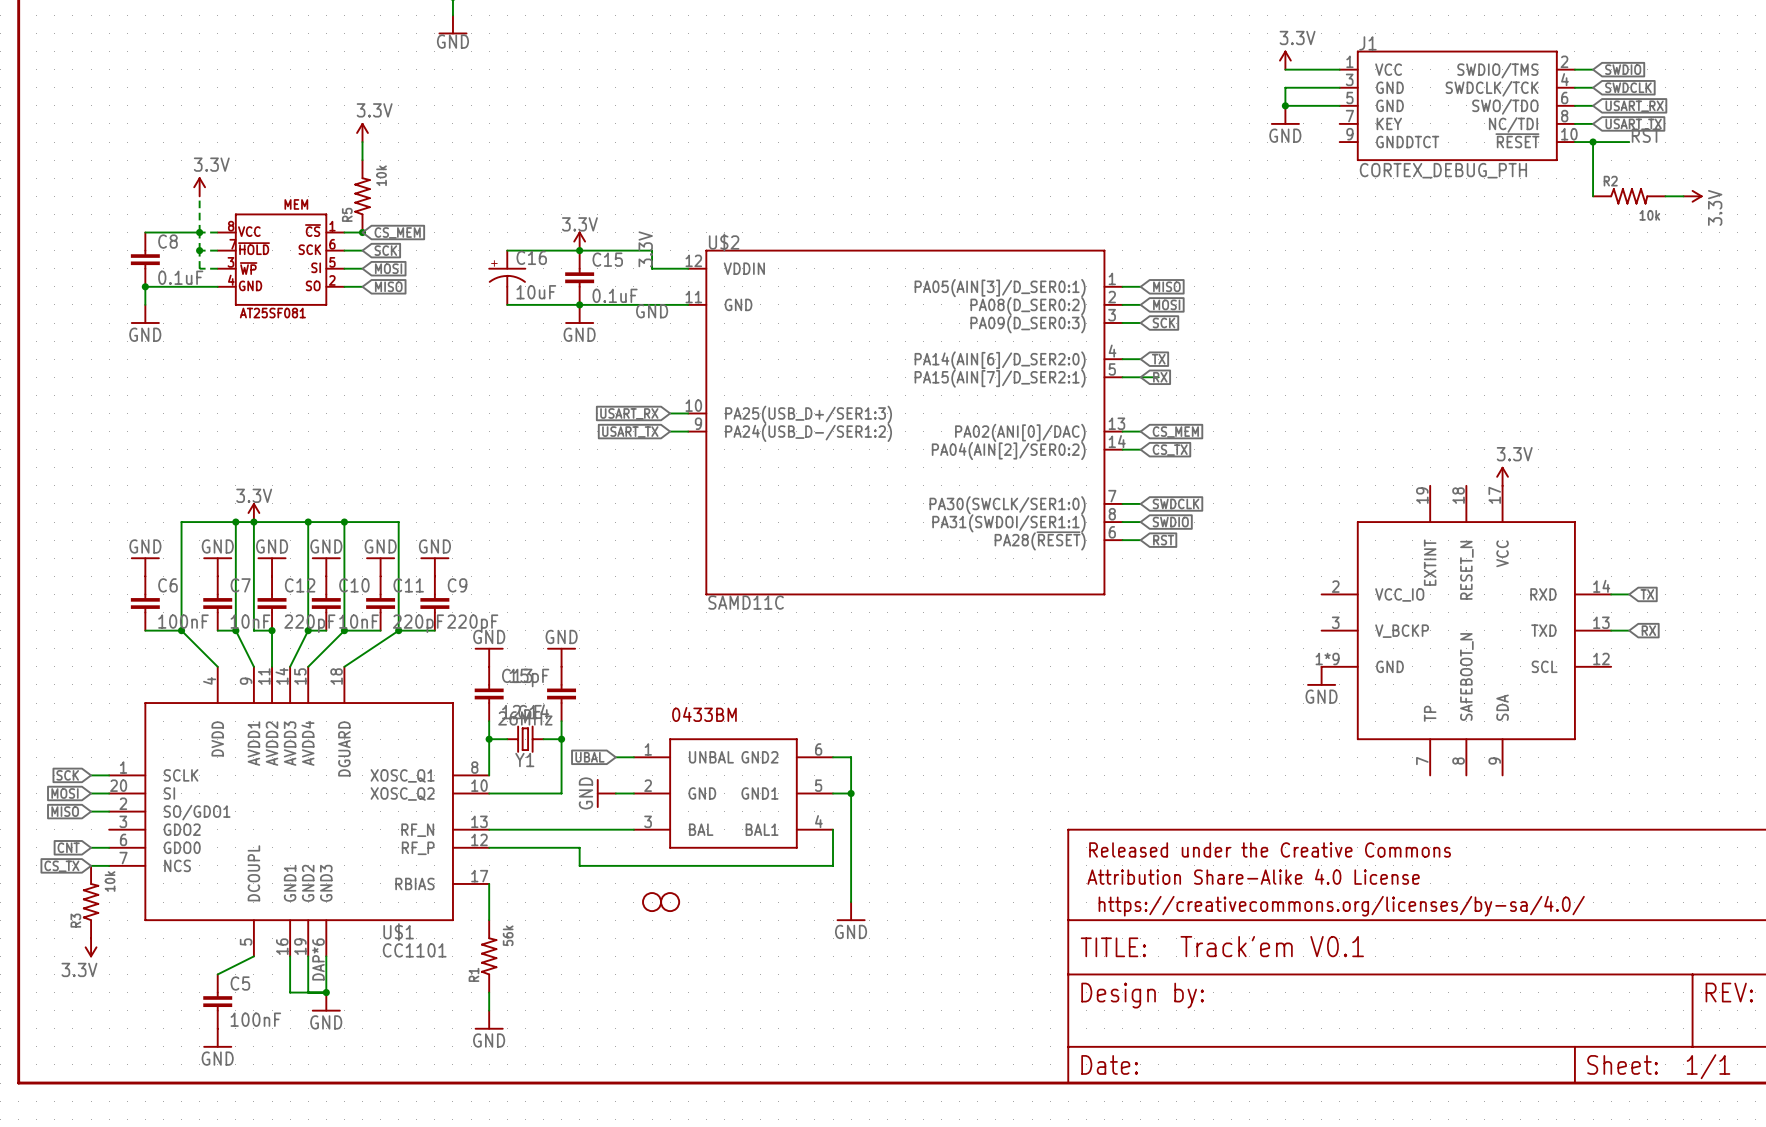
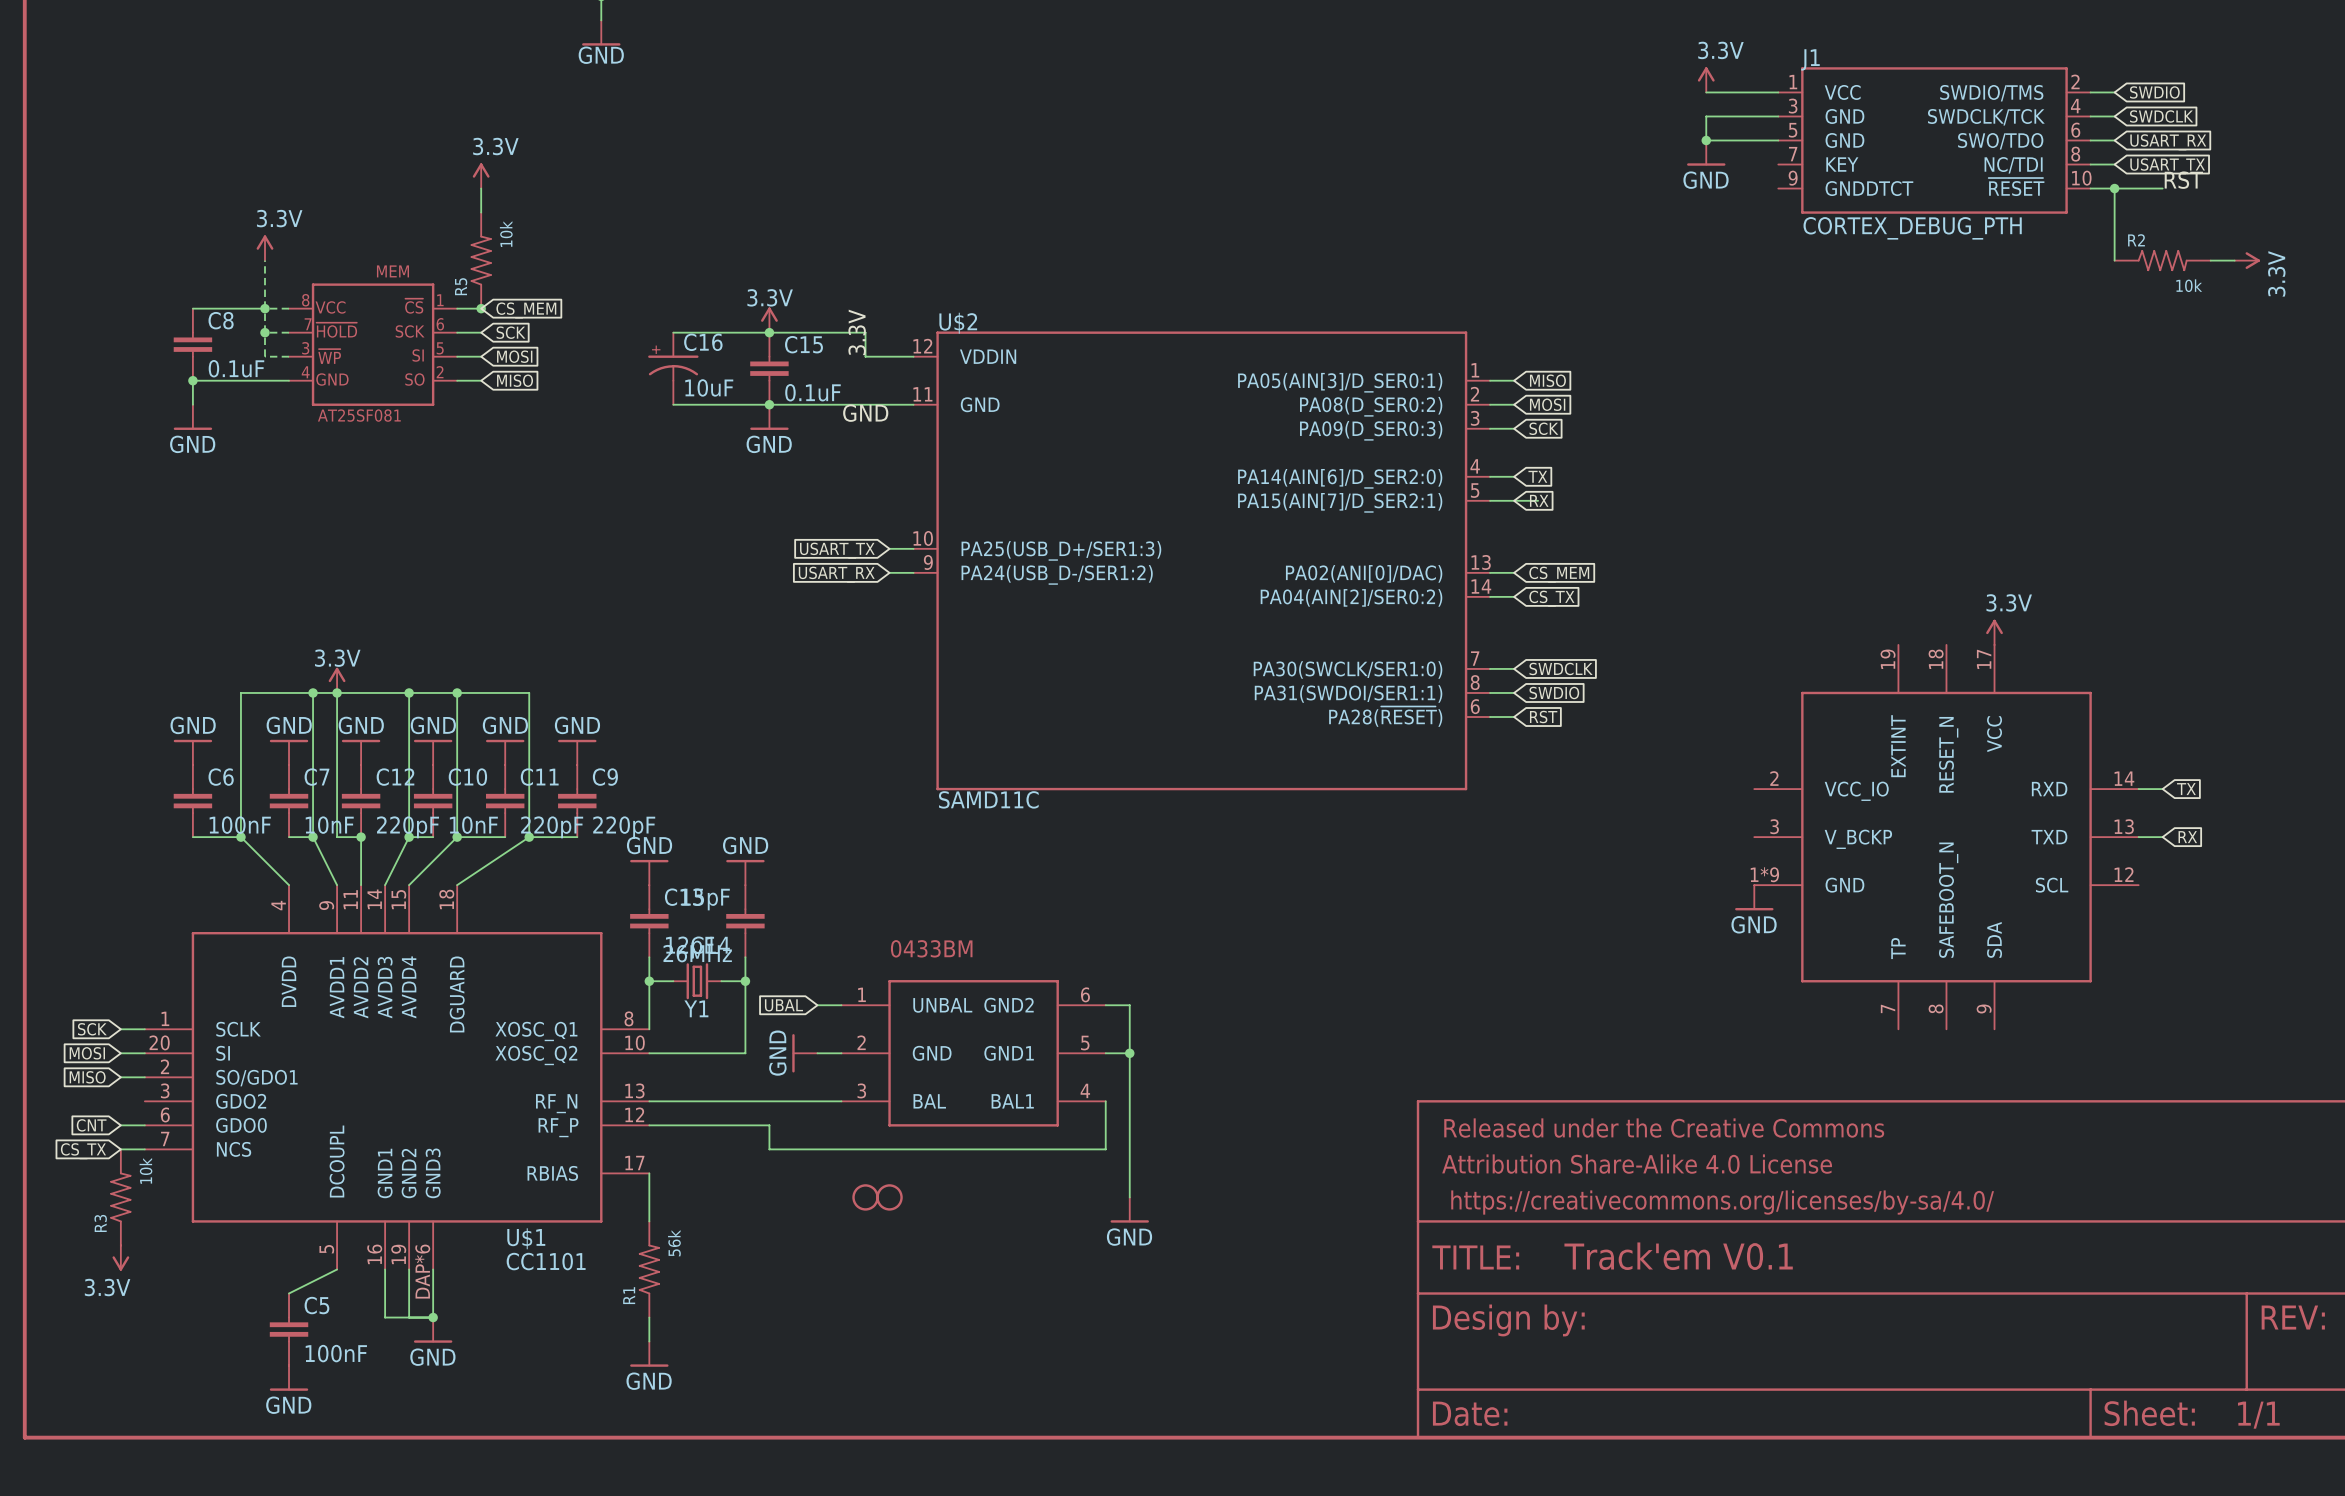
global label: USART_RX (629, 413) -> USART_TX (837, 550)
global label: USART_TX (630, 432) -> USART_RX (836, 574)

